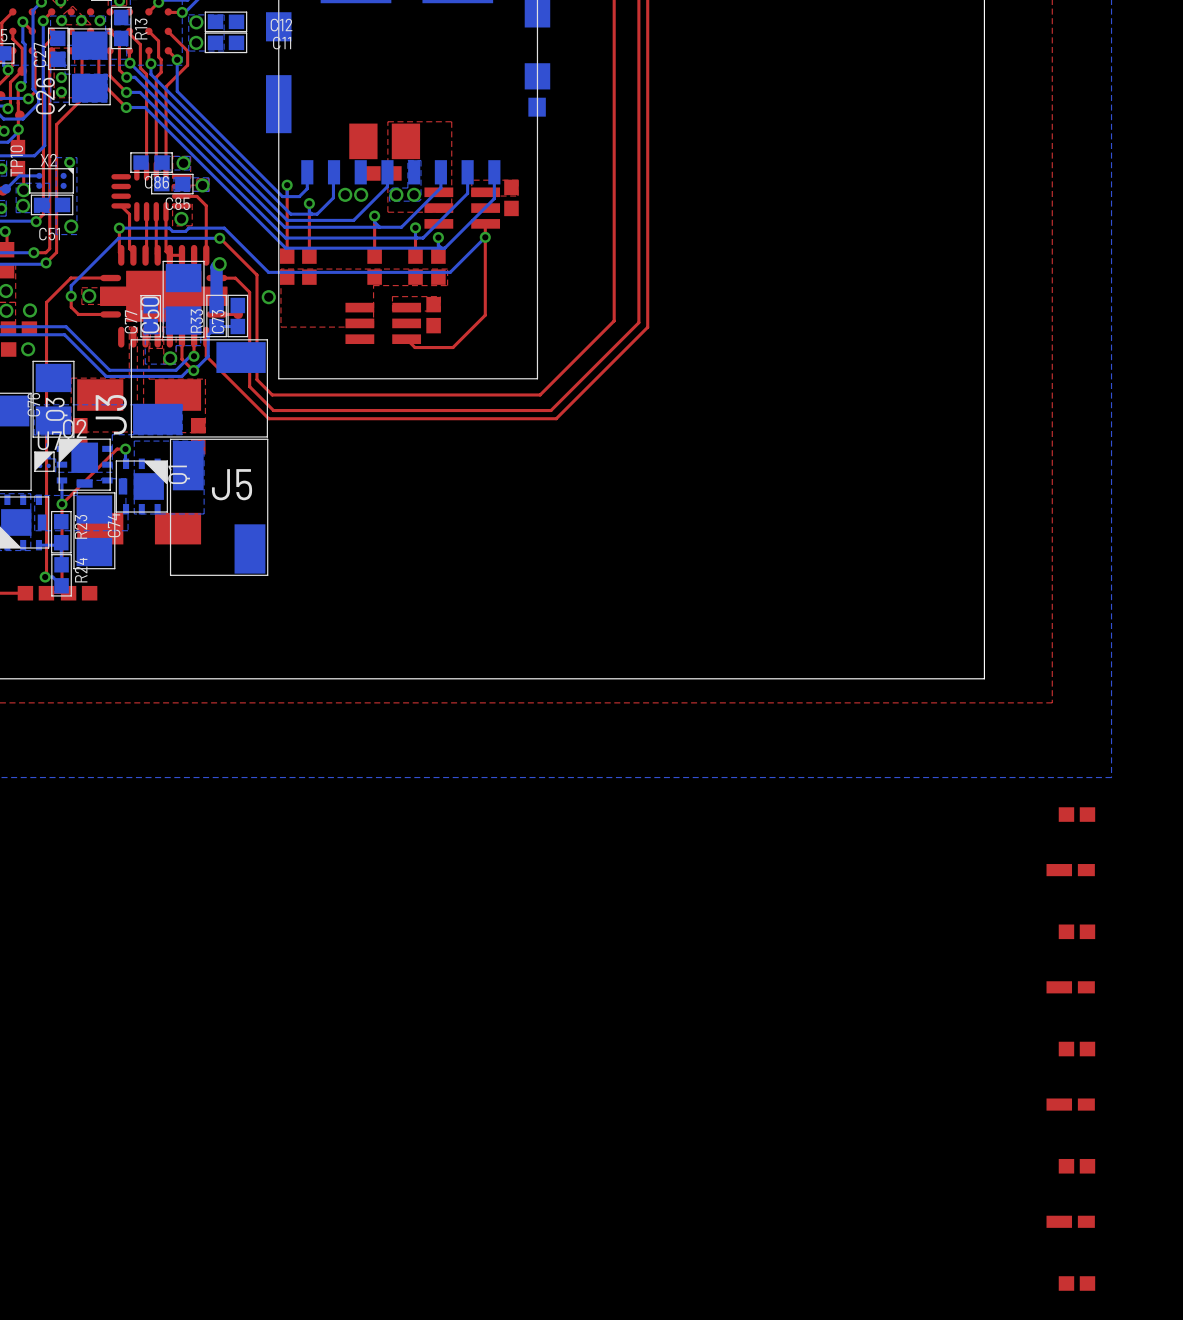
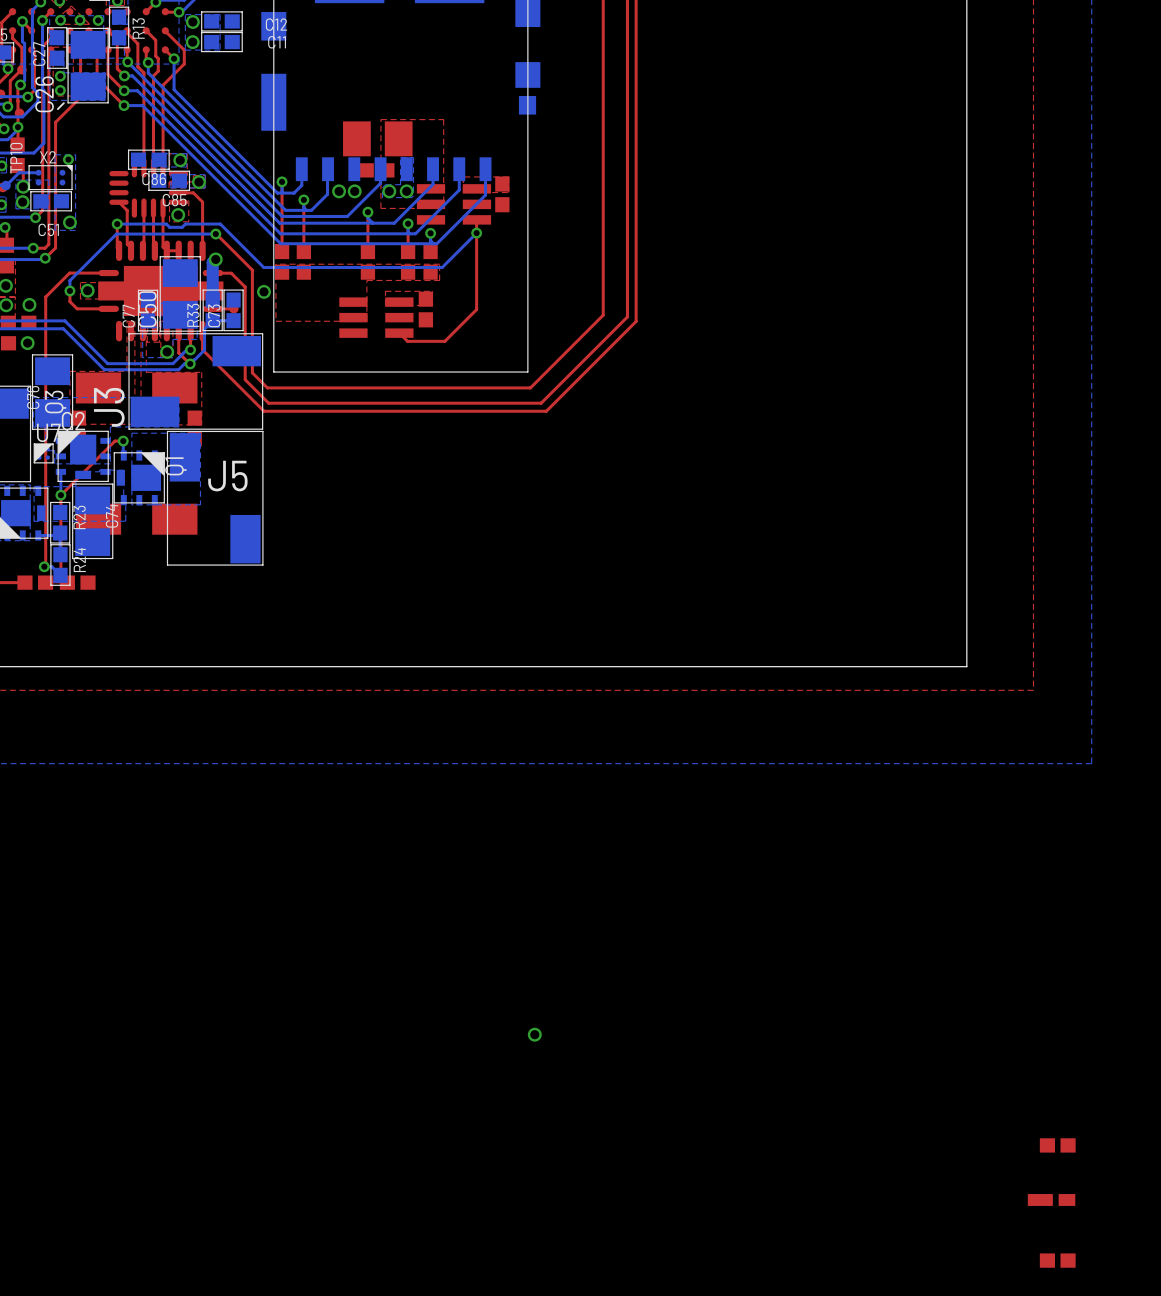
part: (1076, 814) -> none
part: (1070, 870) -> none
part: (1076, 931) -> none
part: (1070, 987) -> none
part: (1076, 1049) -> none
via: none -> (534, 1034)
part: (1070, 1104) -> none

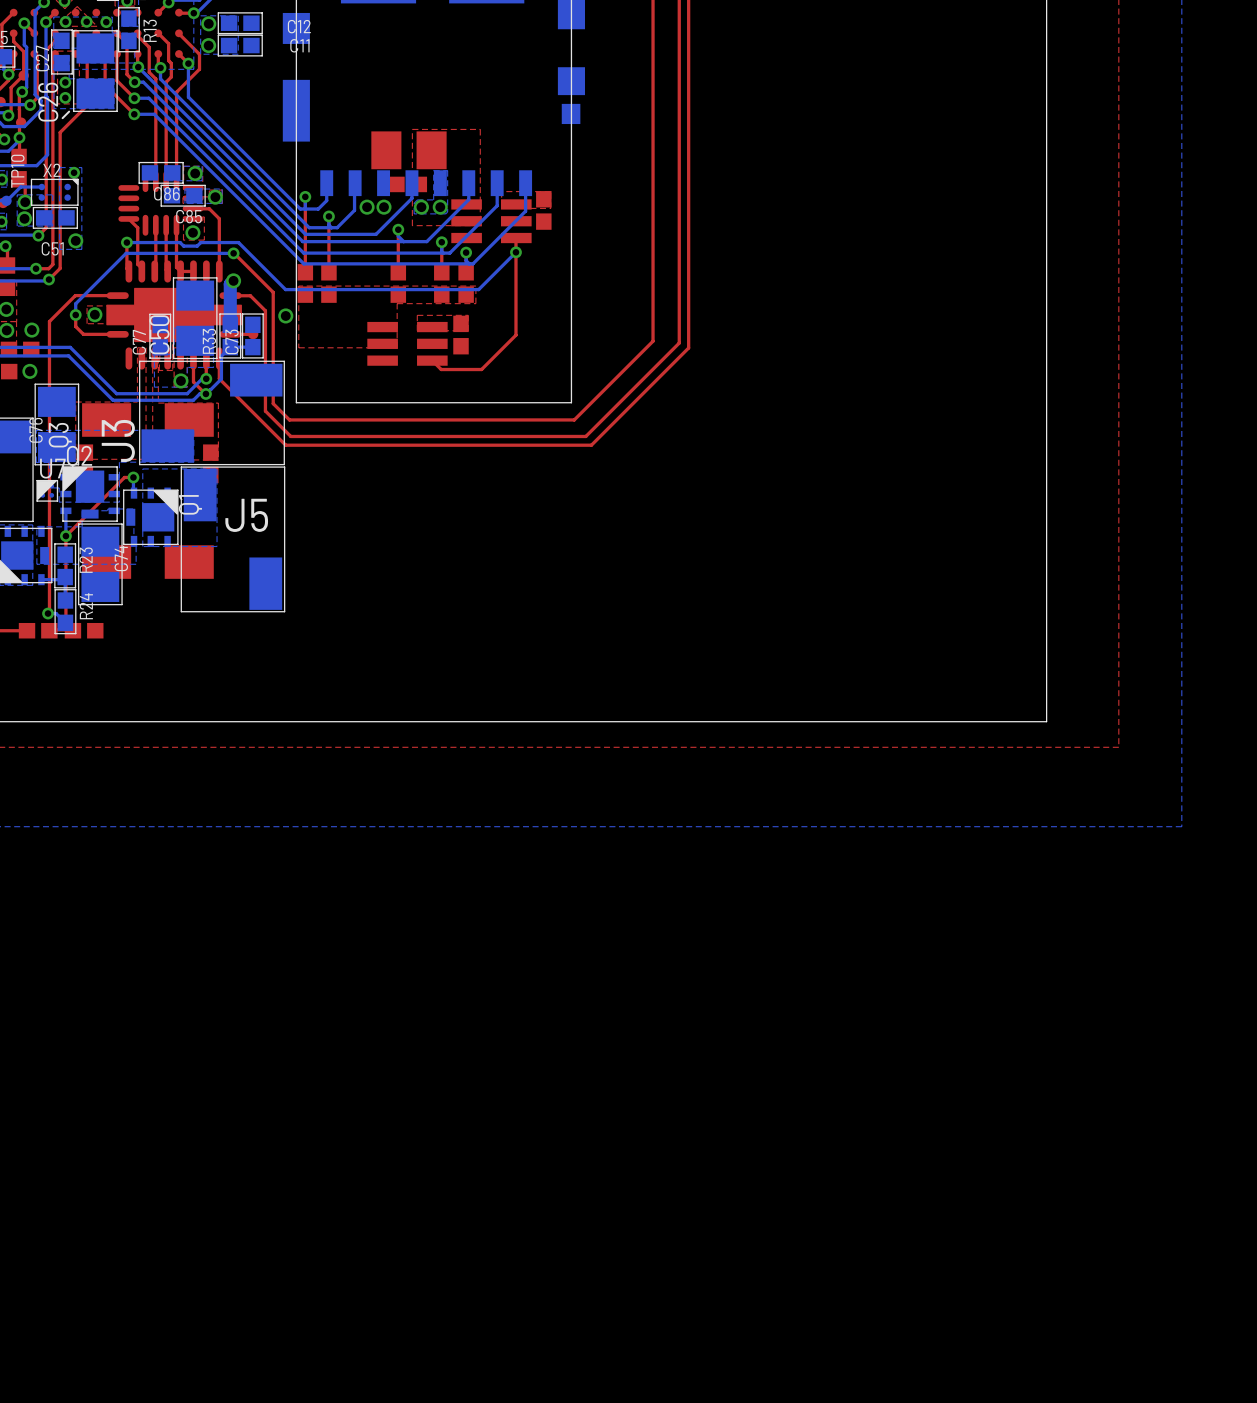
via: (534, 1034) -> none
part: (1057, 1145) -> none
part: (1051, 1199) -> none
part: (1057, 1260) -> none

